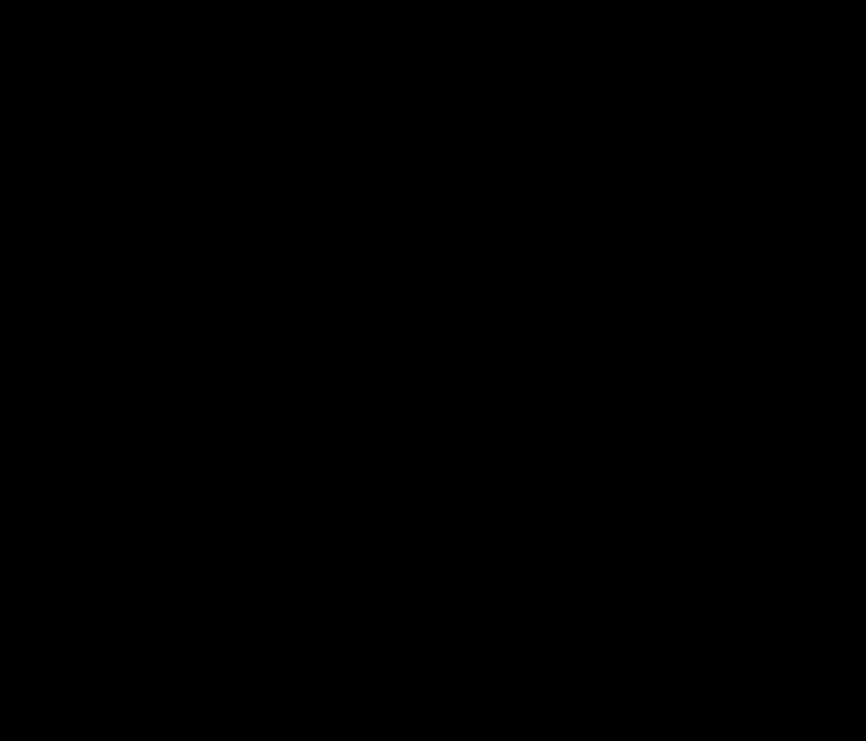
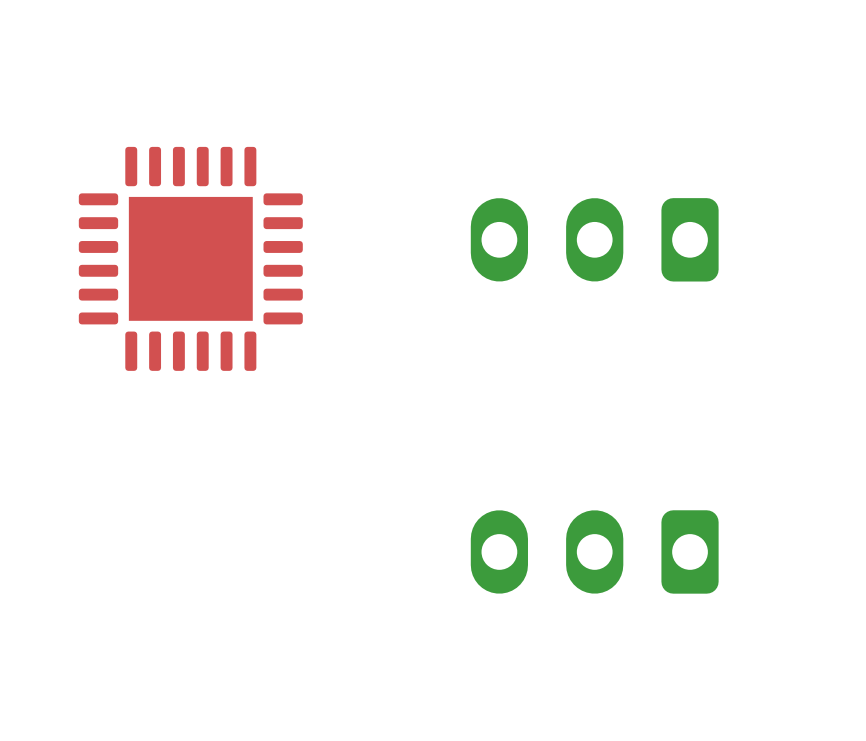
part: none -> (594, 239)
part: none -> (190, 258)
part: none -> (594, 551)

